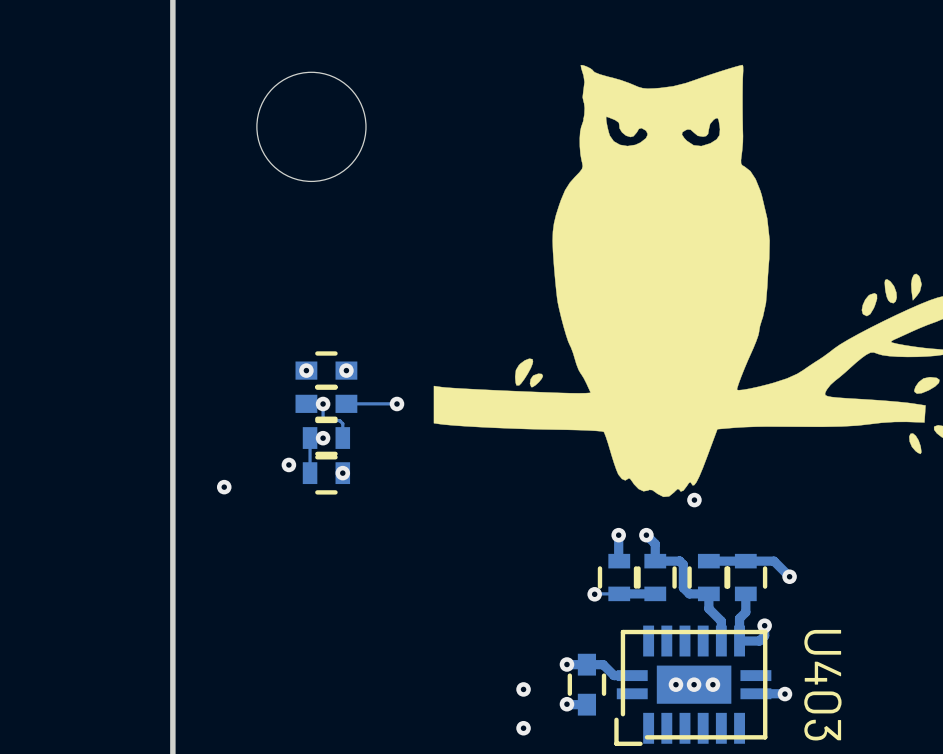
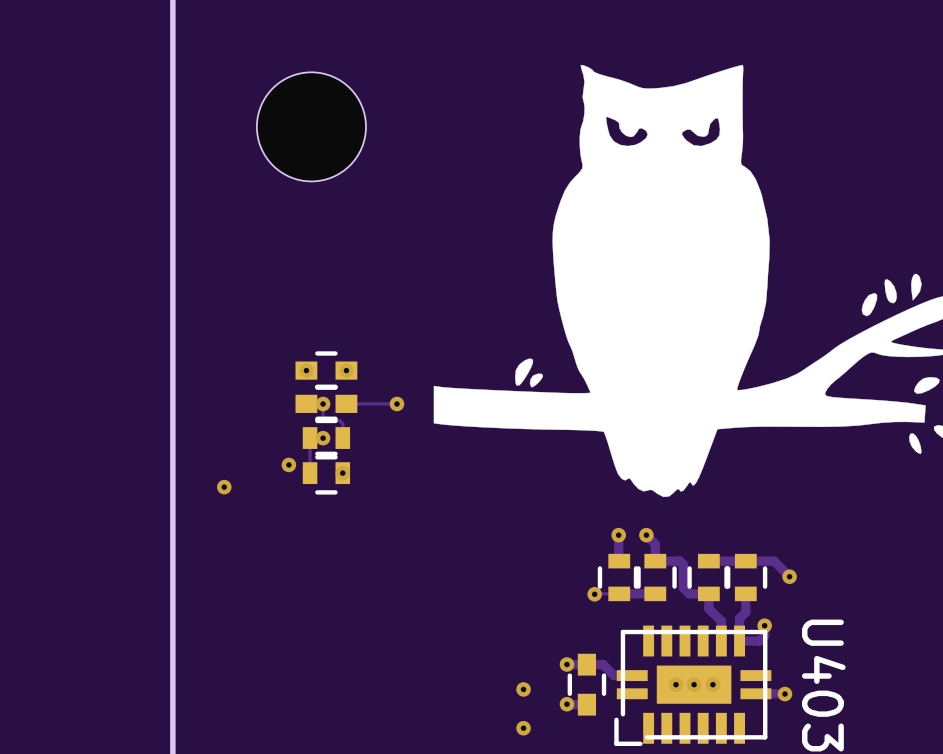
via: (694, 500) -> none

